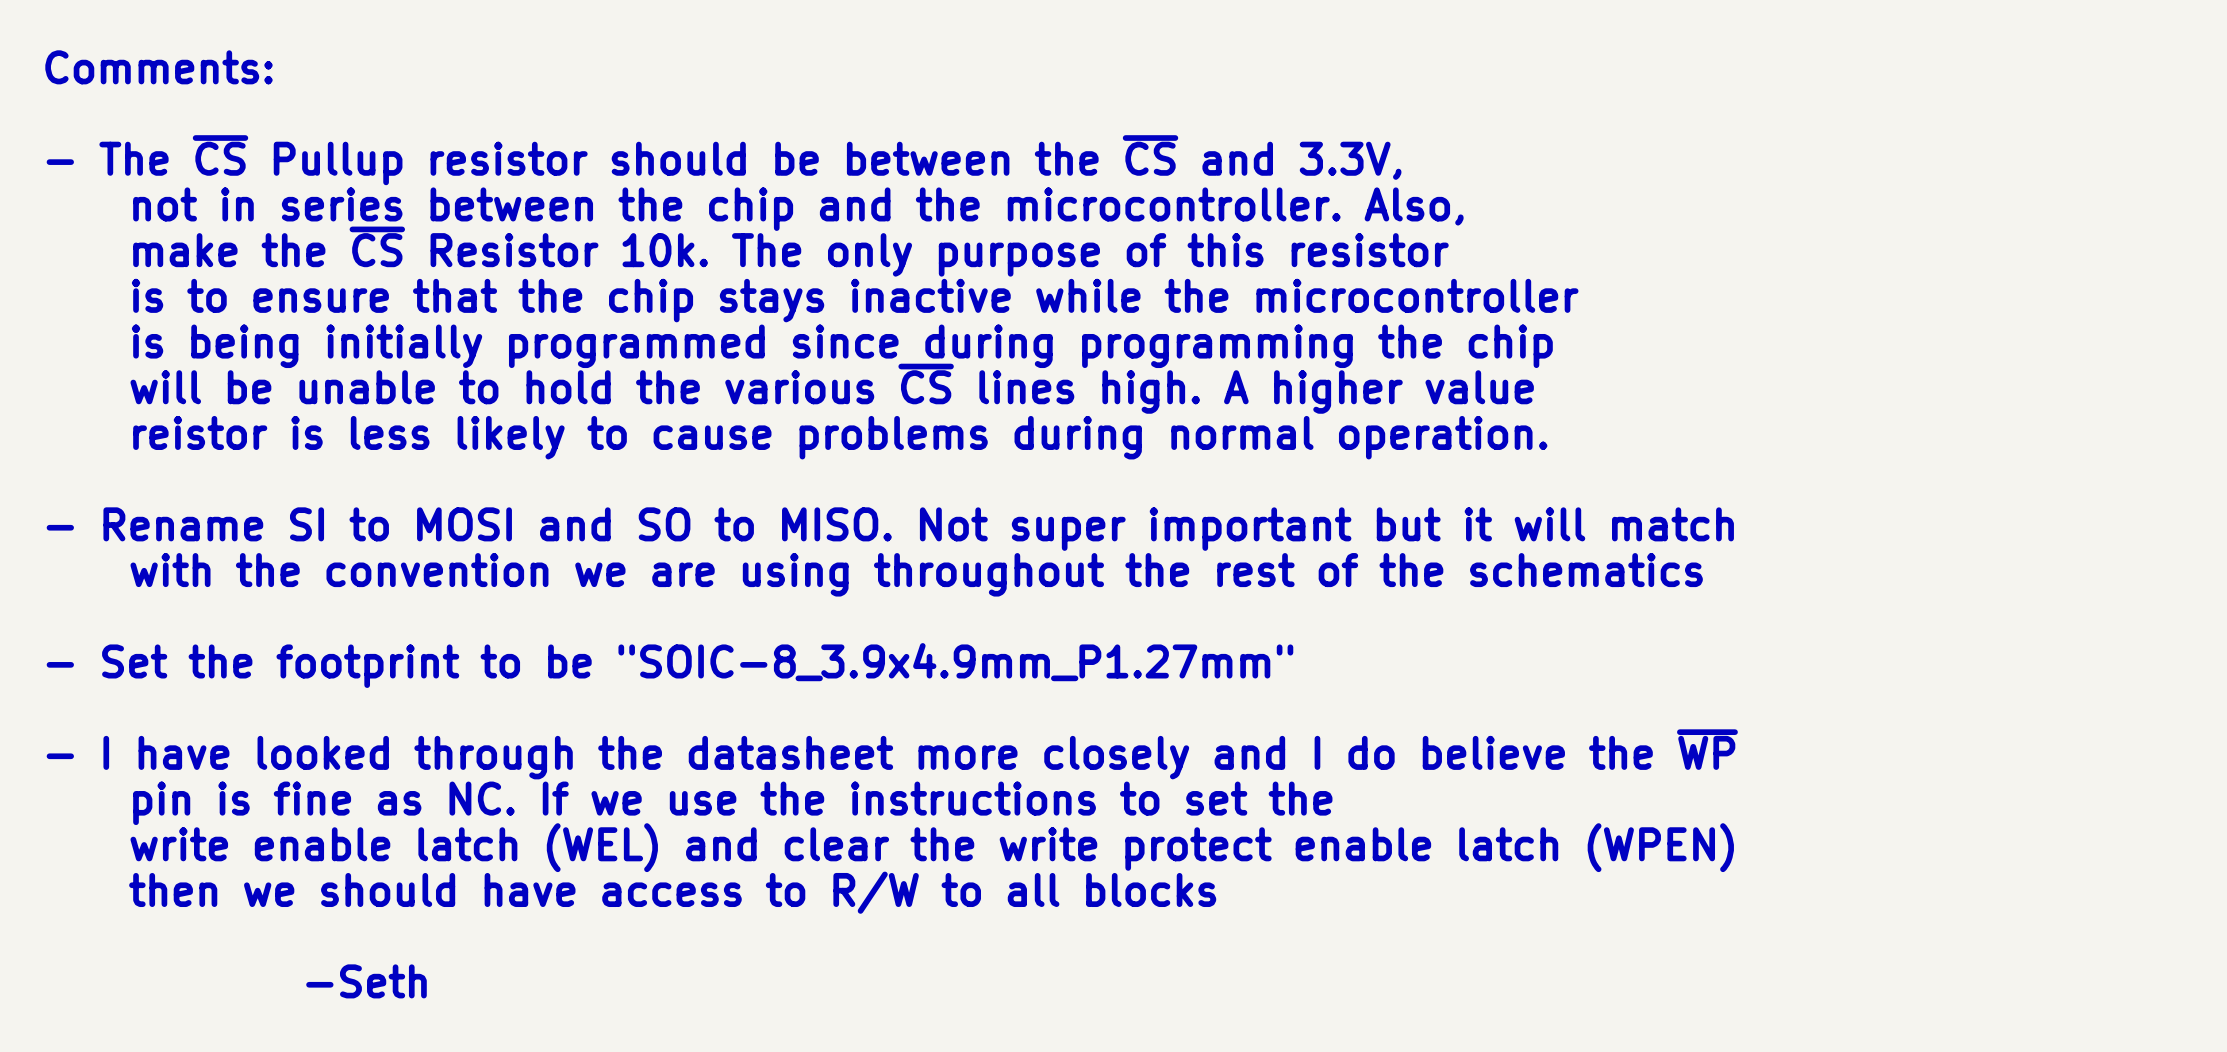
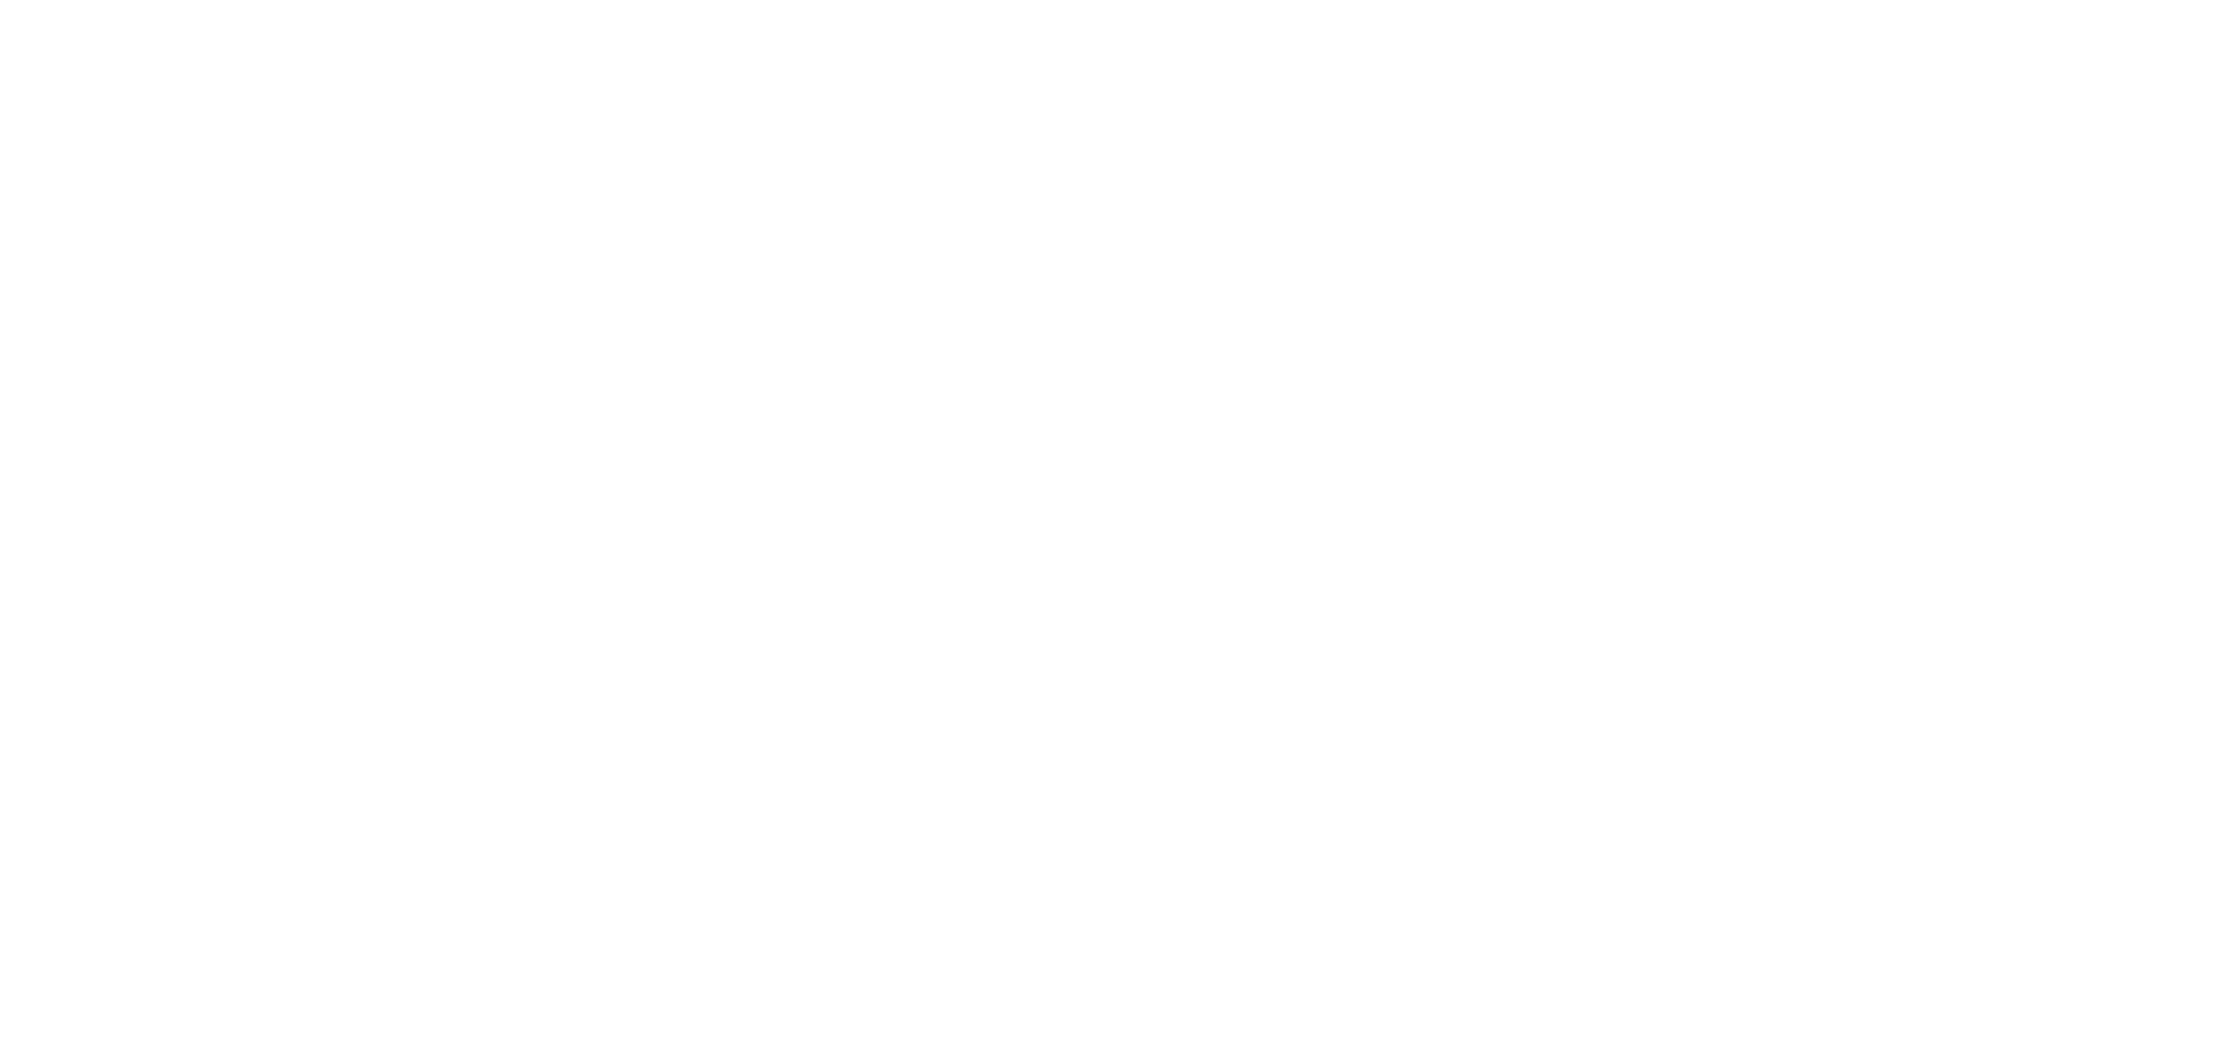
text: Comments: (159, 67) -> none
text: - The ~{CS} Pullup resistor should be between the ~{CS} and 3.3V, (724, 160) -> none
text: not in series between the chip and the microcontroller. Also, (798, 209) -> none
text: make the ~{CS} Resistor 10k. The only purpose of this resistor (790, 251) -> none
text: is to ensure that the chip stays inactive while the microcontroller (855, 300) -> none
text: is being initially programmed since during programming the chip (842, 346) -> none
text: will be unable to hold the various ~{CS} lines high. A higher value (832, 388) -> none
text: reistor is less likely to cause problems during normal operation. (840, 437) -> none
text: - Rename SI to MOSI and SO to MISO. Not super important but it will match (890, 529) -> none
text: with the convention we are using throughout the rest of the schematics (916, 574) -> none
text: - Set the footprint to be "SOIC-8_3.9x4.9mm_P1.27mm" (669, 665) -> none
text: - I have looked through the datasheet more closely and I do believe the ~{WP} (892, 754) -> none
text: pin is fine as NC. If we use the instructions to set the (732, 803) -> none
text: write enable latch (WEL) and clear the write protect enable latch (WPEN) (932, 847) -> none
text: then we should have access to R/W to all blocks (672, 892) -> none
text: -Seth (366, 981) -> none

